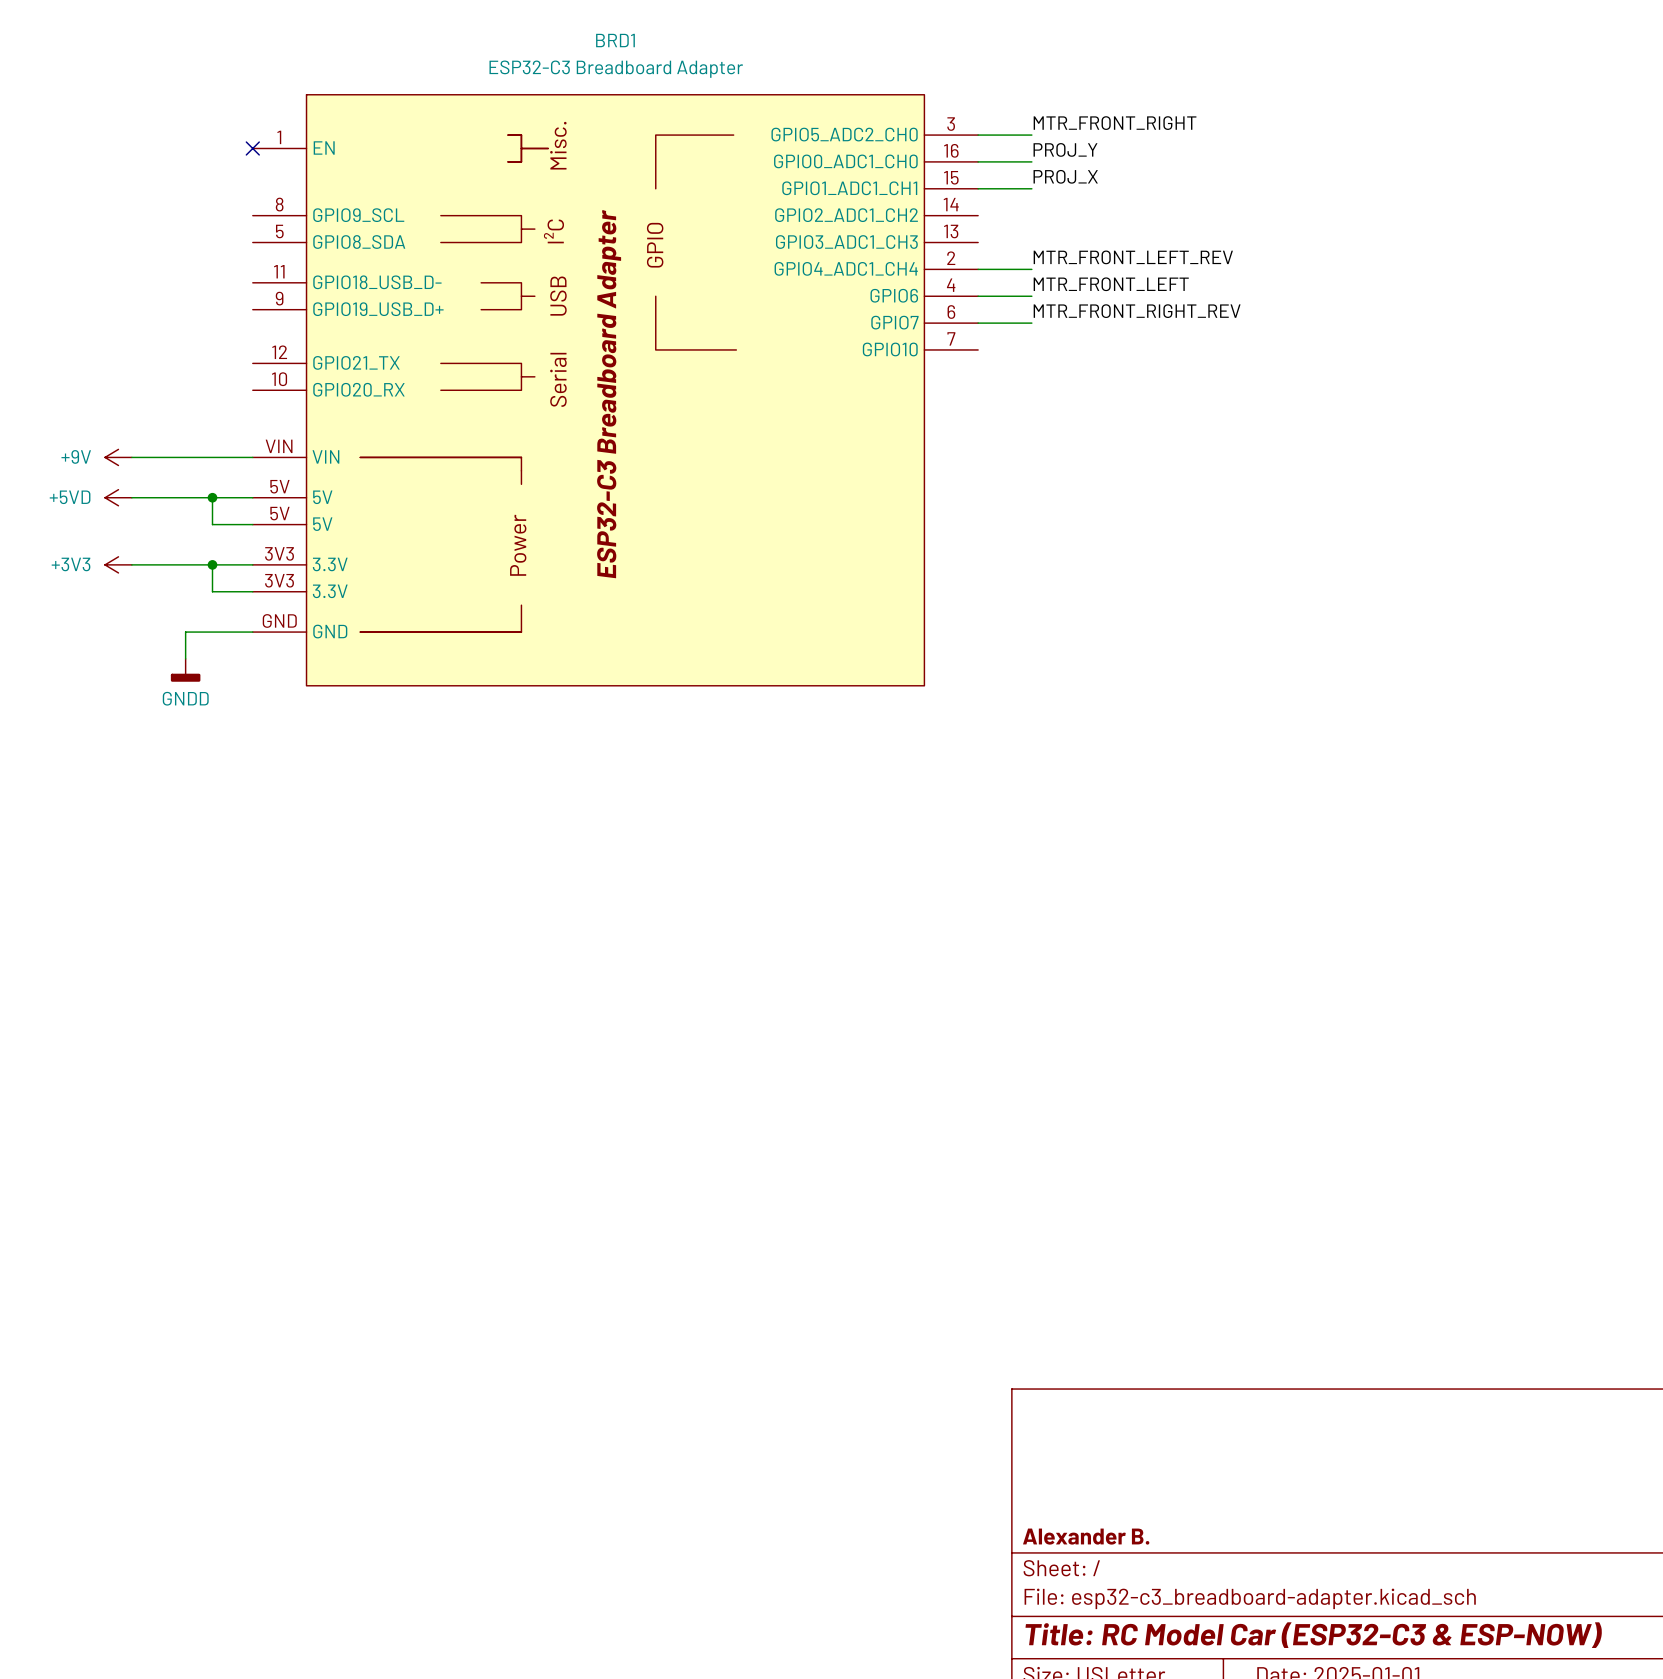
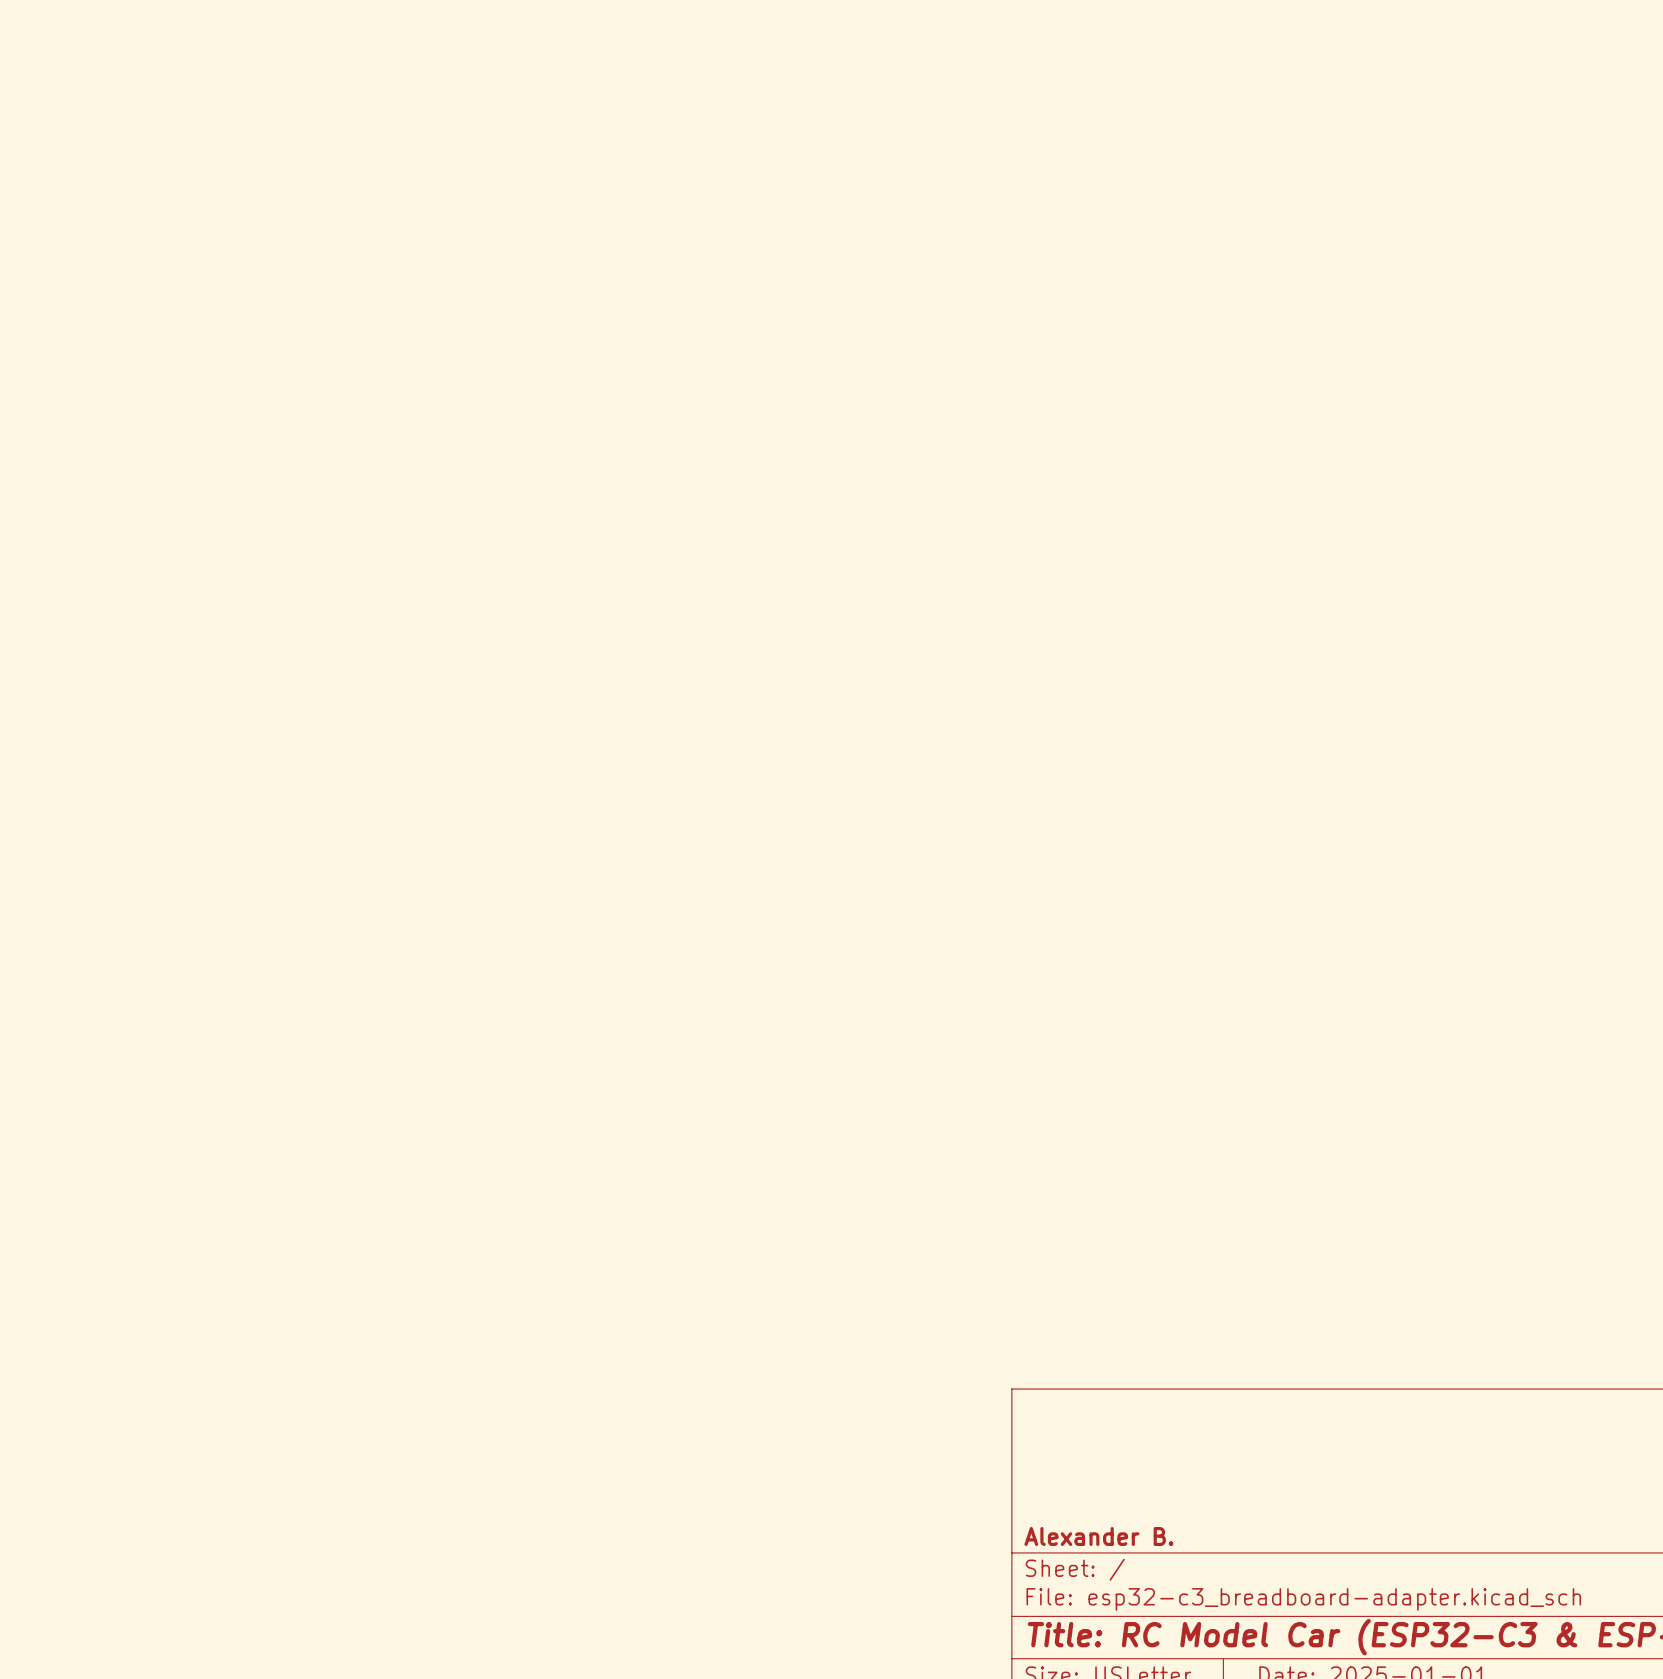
label: MTR_FRONT_RIGHT (1115, 123) -> none
wire: (978, 135) (1031, 135) -> none
no-connect mark: (252, 148) -> none
label: PROJ_Y (1065, 149) -> none
wire: (978, 161) (1031, 161) -> none
label: PROJ_X (1065, 176) -> none
wire: (978, 188) (1031, 188) -> none
label: MTR_FRONT_LEFT_REV (1133, 257) -> none
wire: (978, 269) (1031, 269) -> none
label: MTR_FRONT_LEFT (1111, 284) -> none
wire: (978, 296) (1031, 296) -> none
label: MTR_FRONT_RIGHT_REV (1137, 311) -> none
wire: (978, 323) (1031, 323) -> none
BRD1: ESP32-C3 Breadboard Adapter (615, 390) -> none
power symbol: +9V (118, 457) -> none
wire: (131, 457) (252, 457) -> none
power symbol: +5VD (118, 497) -> none
wire: (131, 497) (252, 497) -> none
wire: (212, 497) (212, 524) (252, 524) -> none
junction: (212, 497) -> none
power symbol: +3V3 (118, 564) -> none
wire: (131, 564) (252, 564) -> none
wire: (212, 564) (212, 591) (252, 591) -> none
junction: (212, 564) -> none
wire: (252, 632) (185, 632) (185, 658) -> none
power symbol: GNDD (185, 670) -> none

